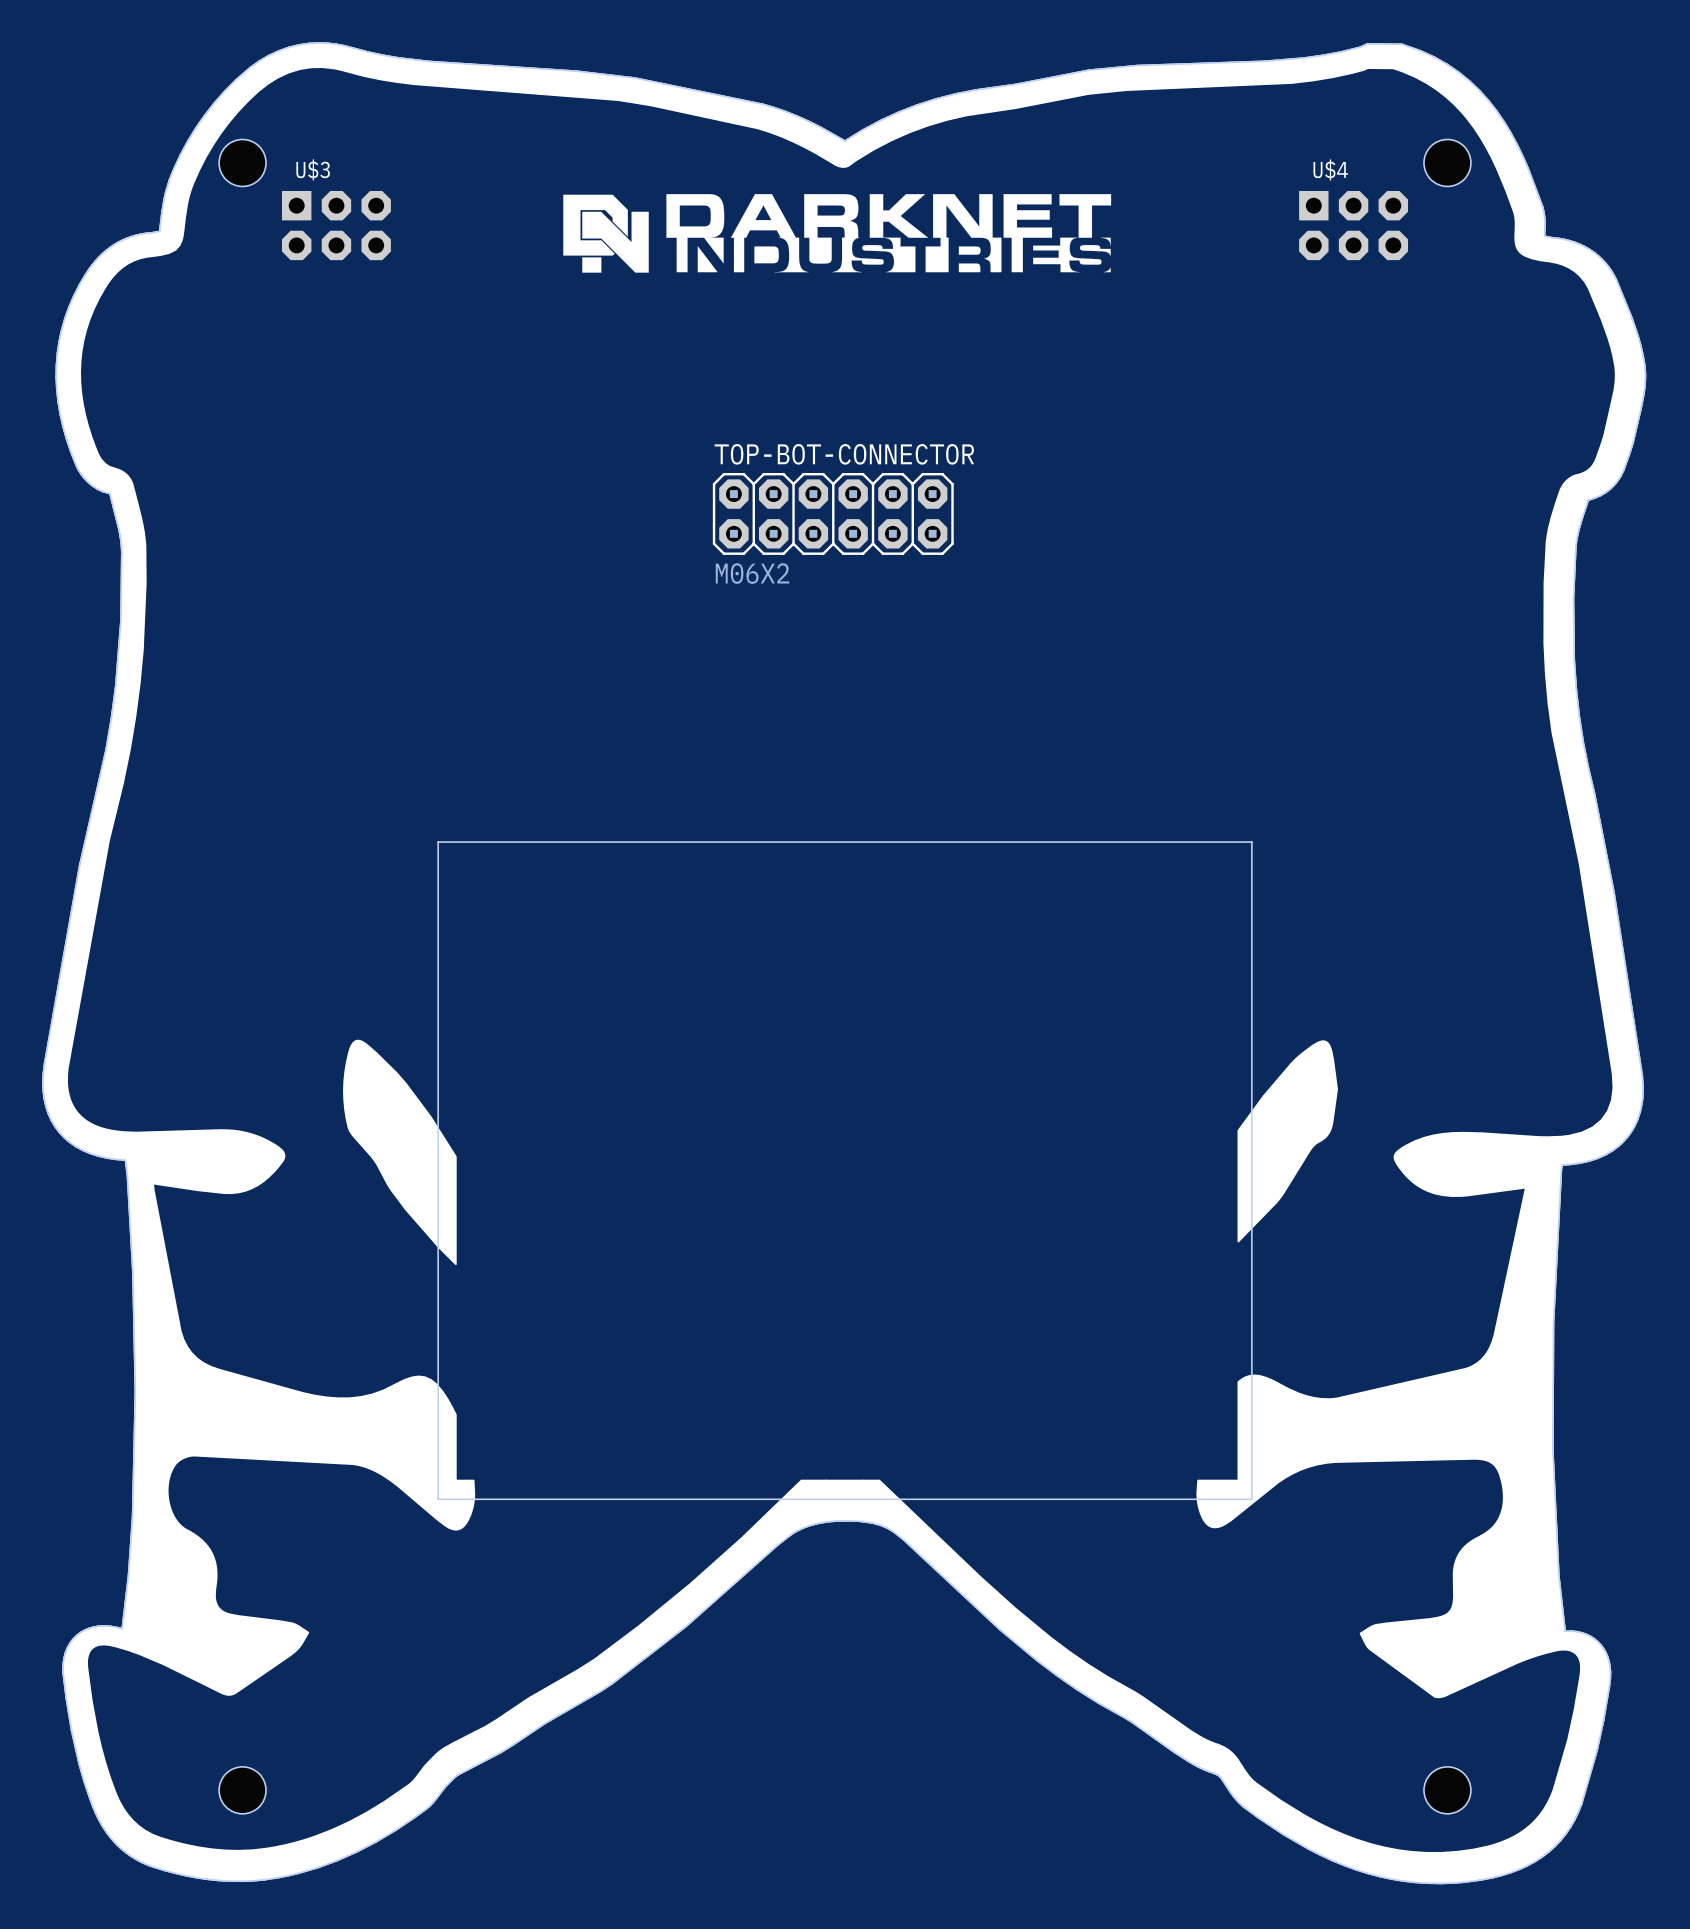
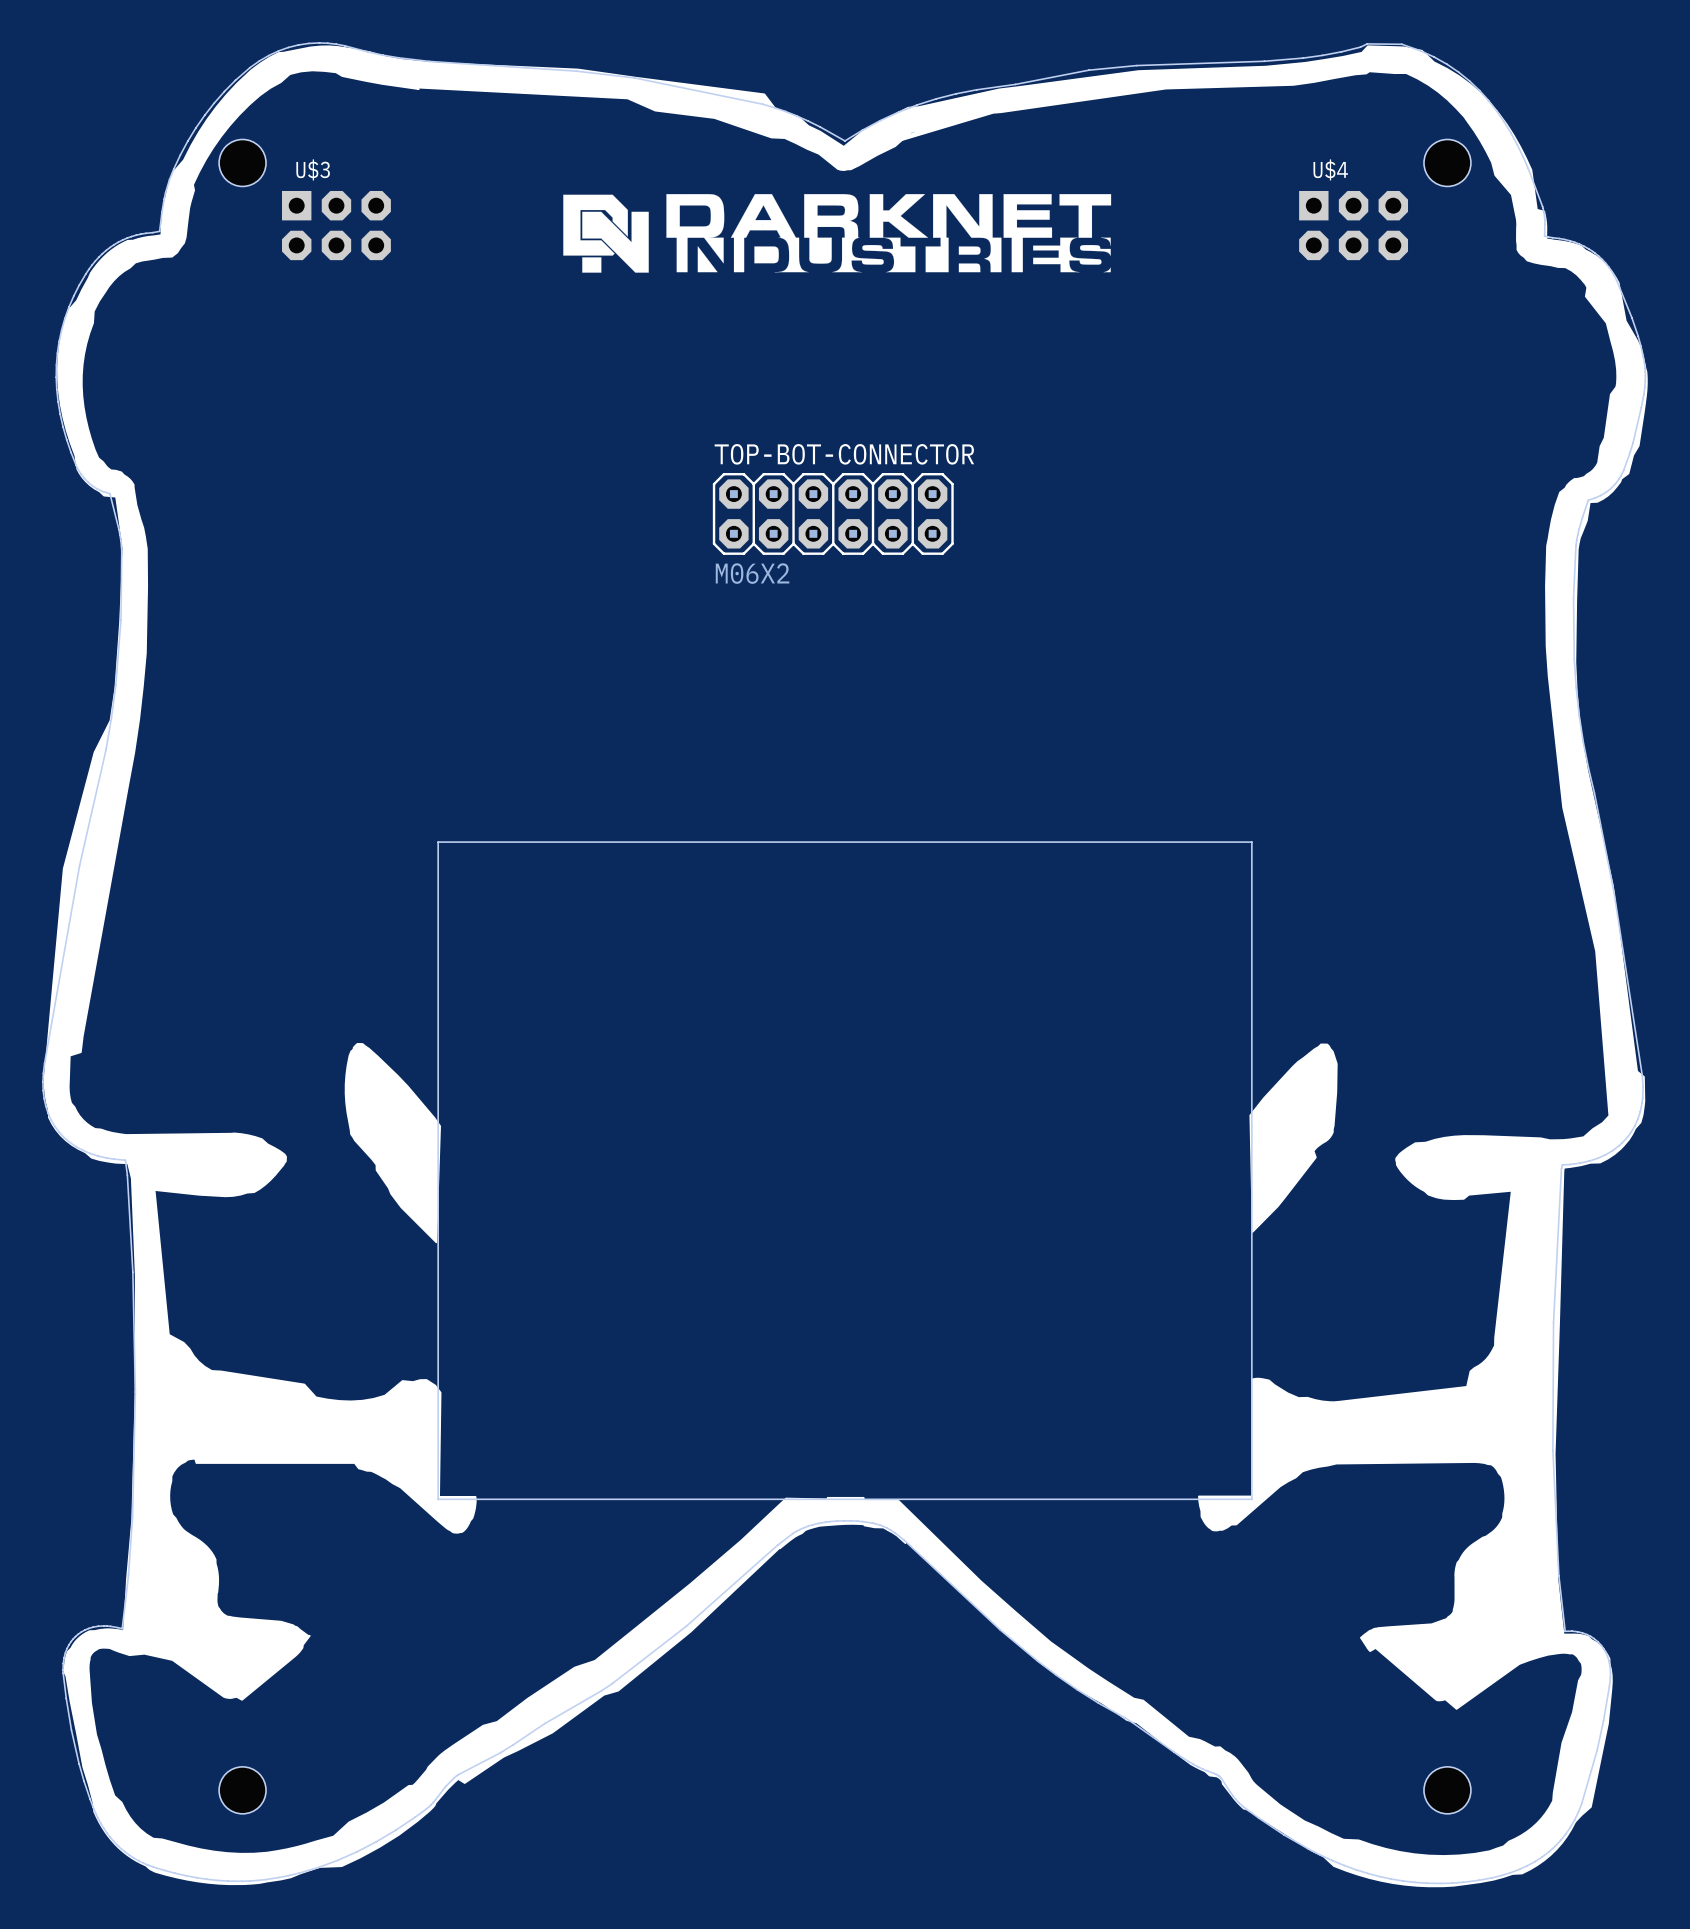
drawing shape: [42, 42, 1647, 1885] -> [43, 45, 1648, 1888]
drawing shape: [343, 1039, 457, 1266] -> [344, 1043, 442, 1244]
drawing shape: [1237, 1040, 1338, 1243] -> [1249, 1043, 1338, 1233]
drawing shape: [825, 1479, 864, 1523] -> [826, 1496, 865, 1527]

